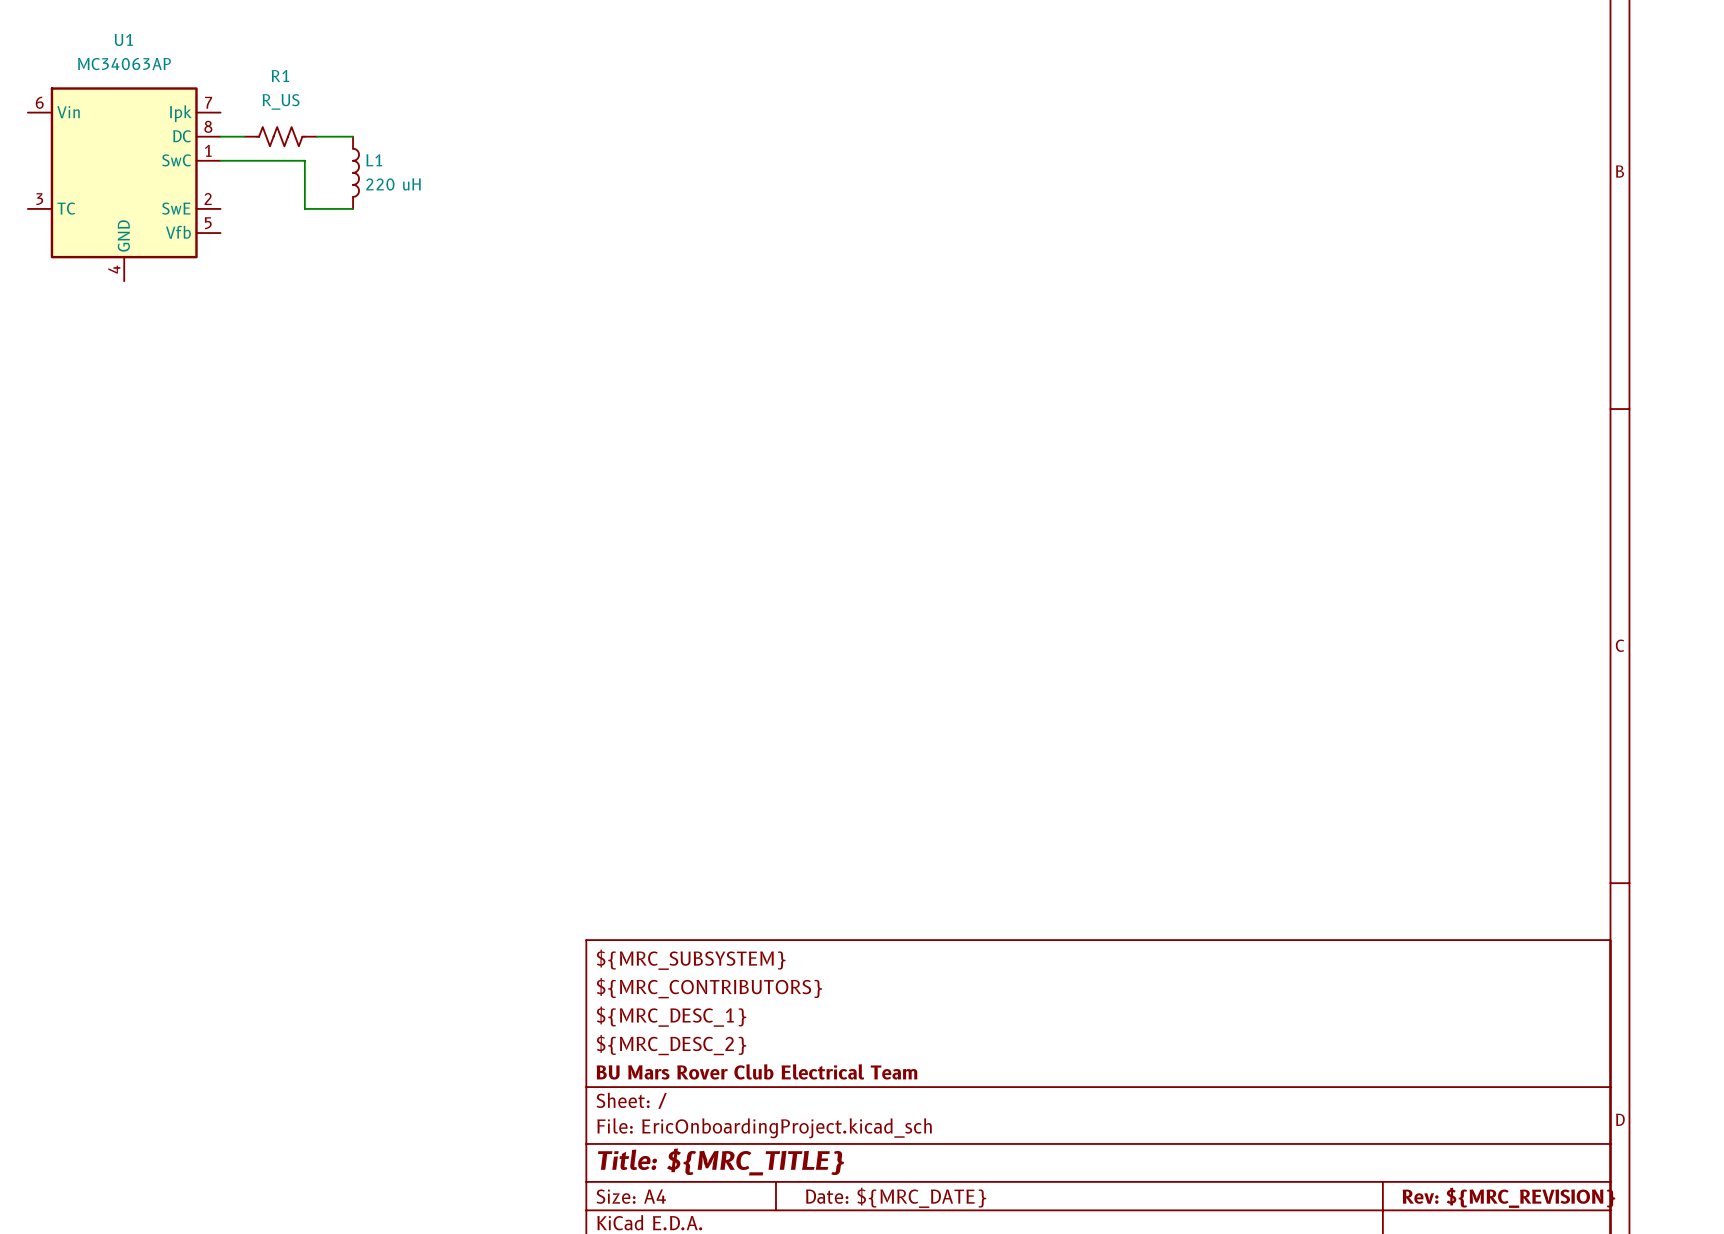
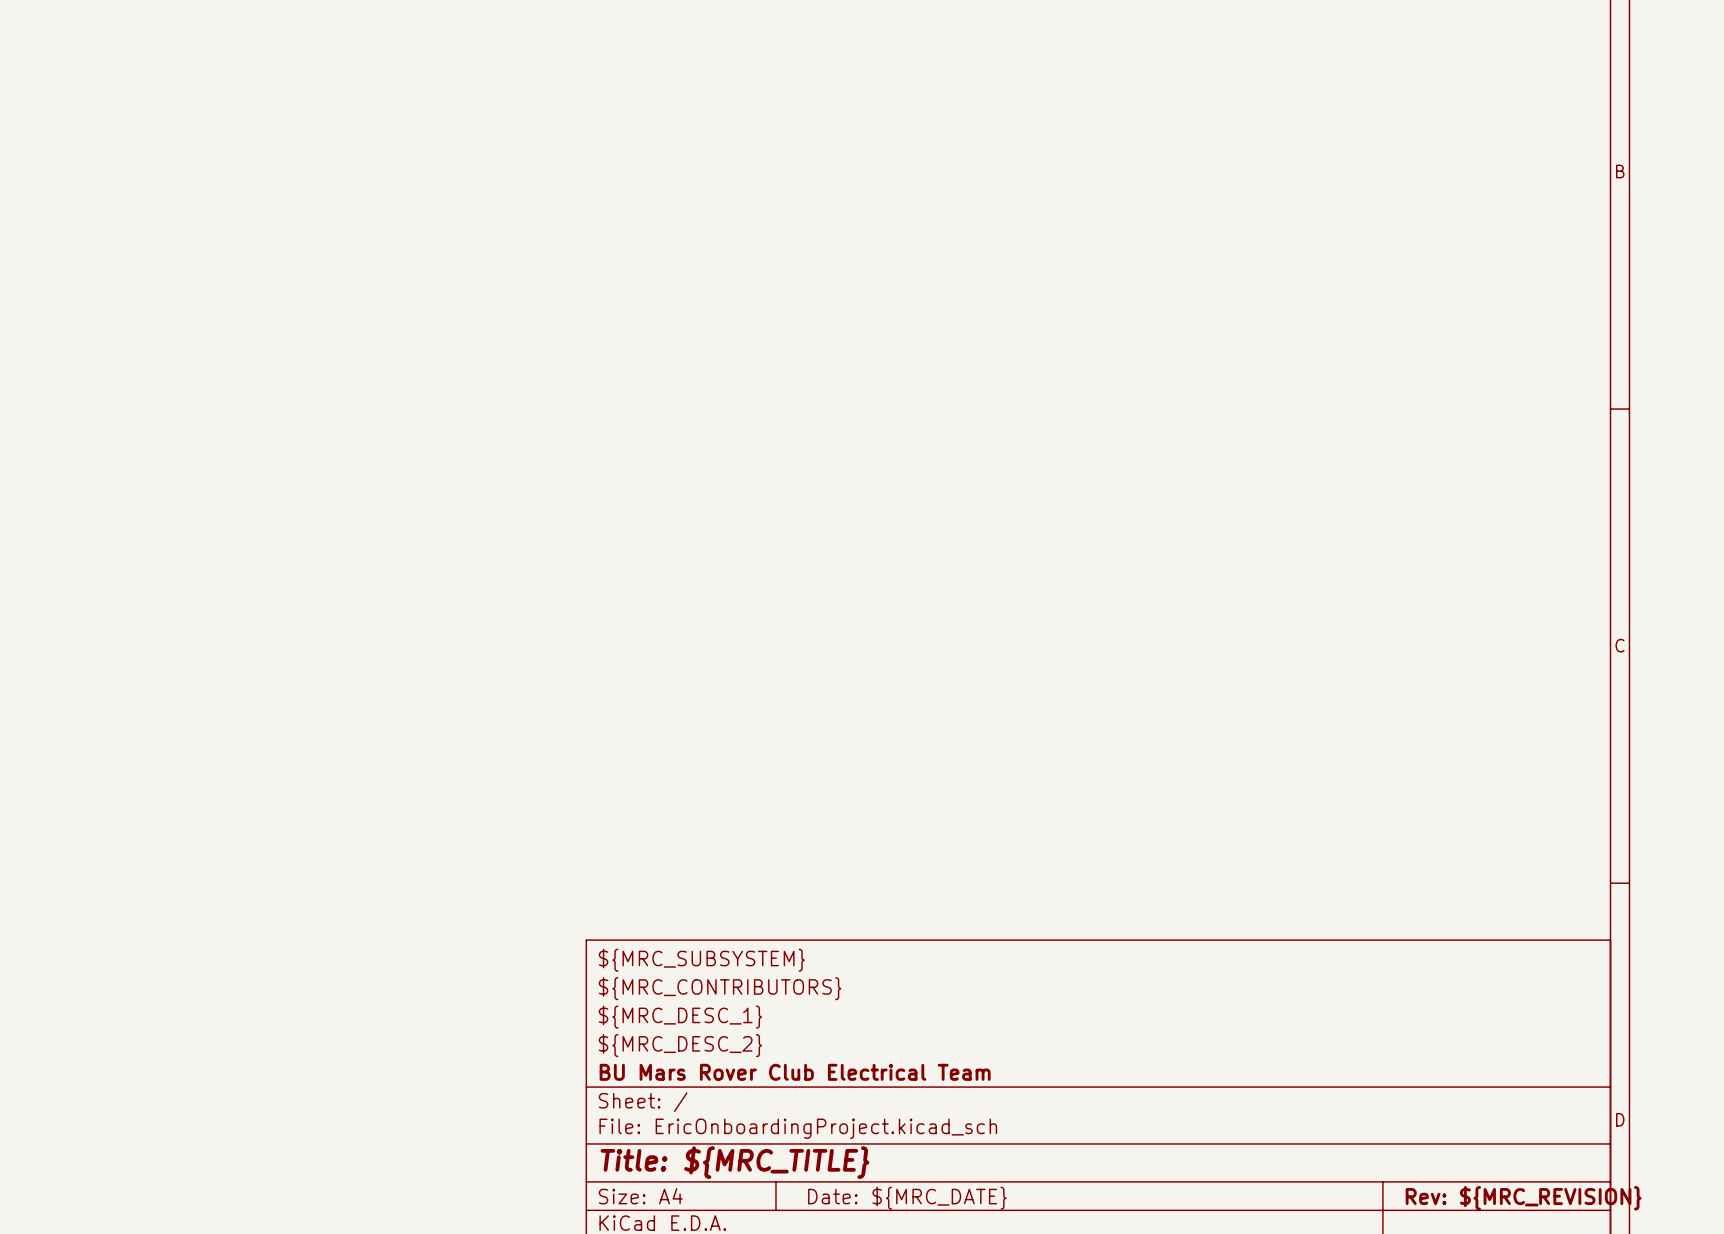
wire: (220, 136) (244, 136) -> none
R1: R_US (280, 136) -> none
wire: (316, 136) (353, 136) -> none
wire: (220, 160) (304, 160) (304, 208) (353, 208) -> none
L1: 220 uH (356, 172) -> none
U1: MC34063AP (124, 184) -> none

